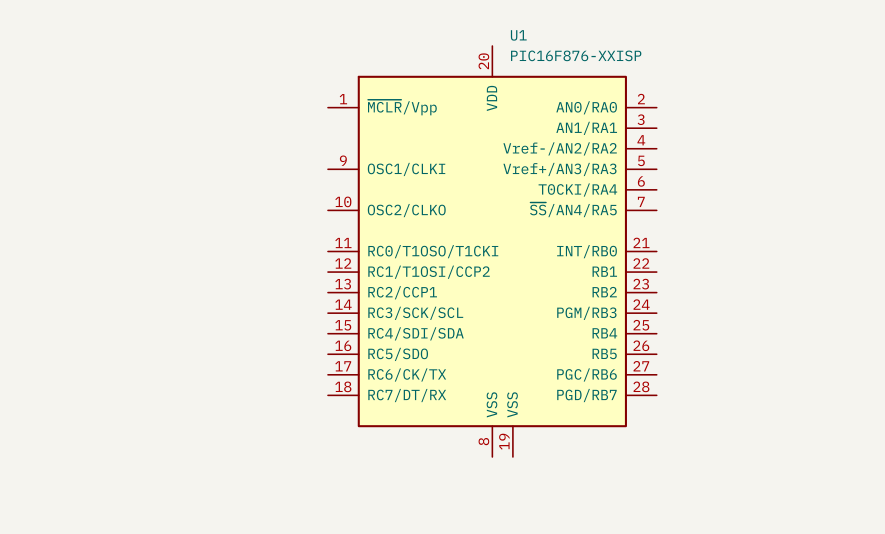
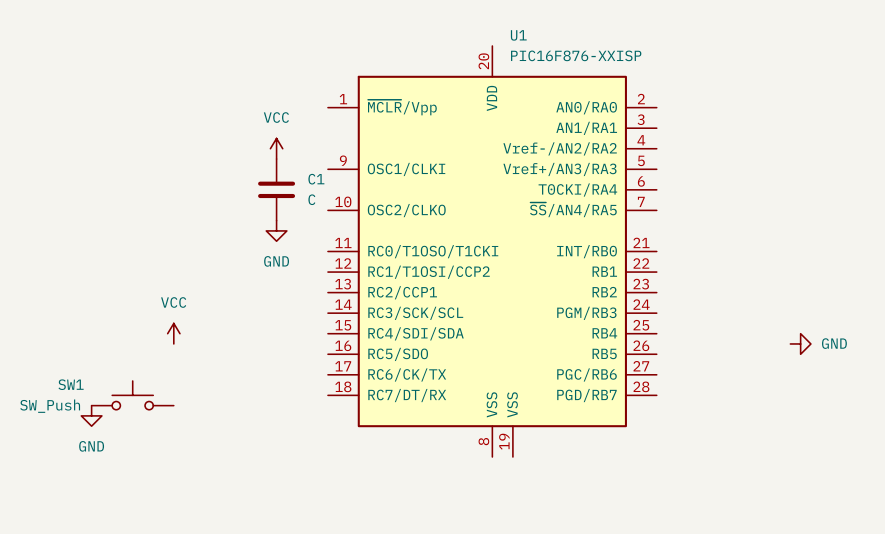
power symbol: none -> VCC (276, 148)
C1: none -> C (276, 189)
power symbol: none -> GND (276, 230)
power symbol: none -> VCC (173, 333)
power symbol: none -> GND (800, 343)
SW1: none -> SW_Push (132, 395)
power symbol: none -> GND (91, 415)

